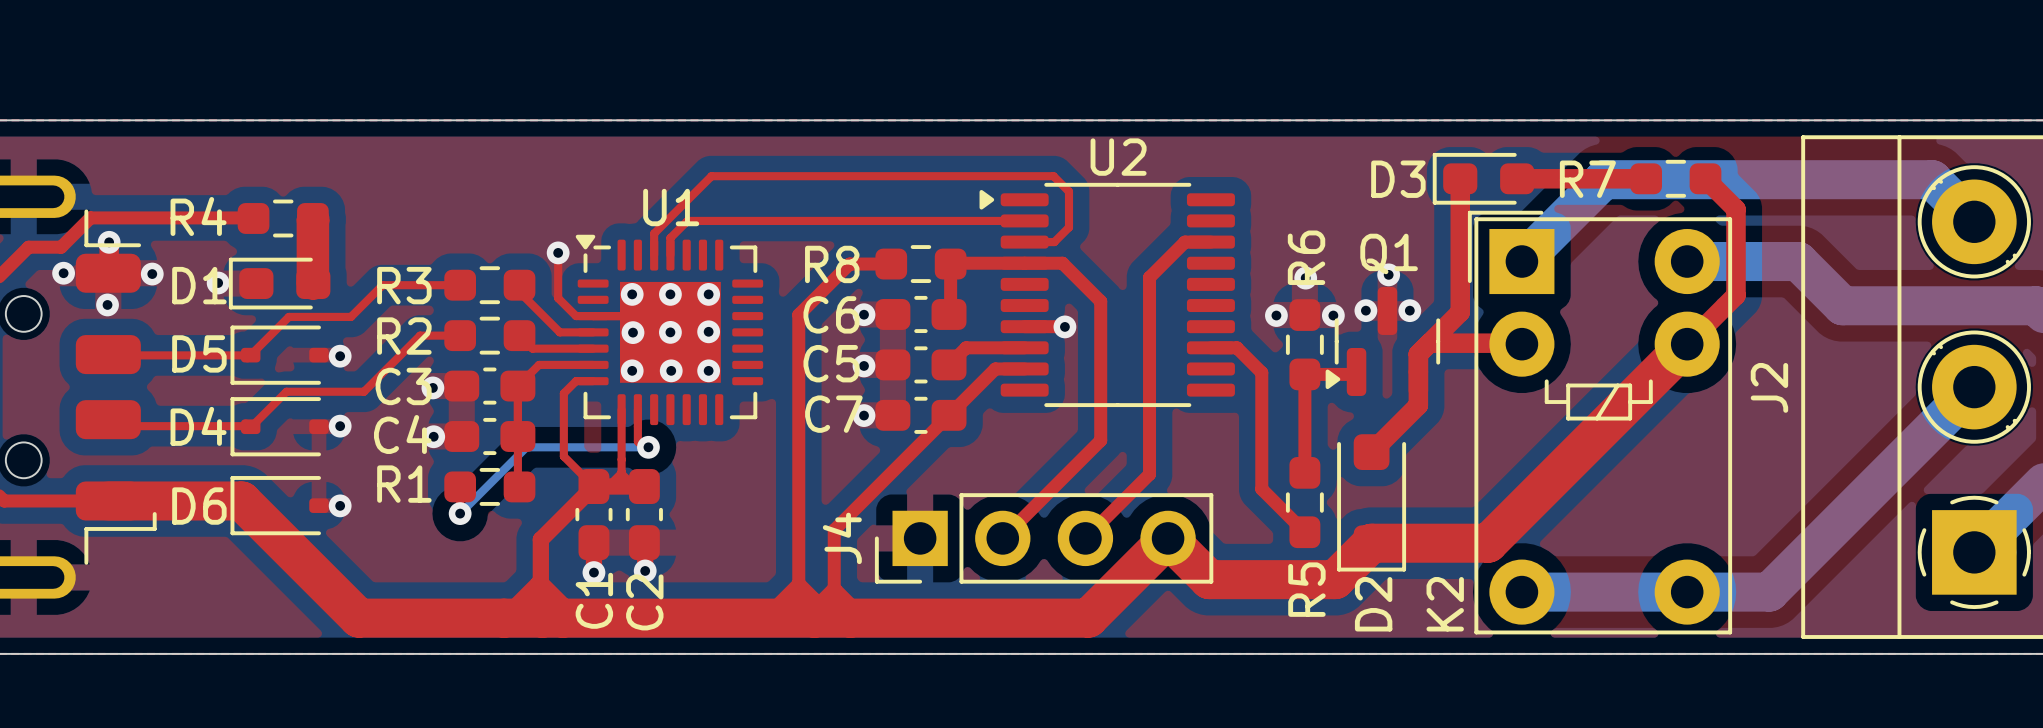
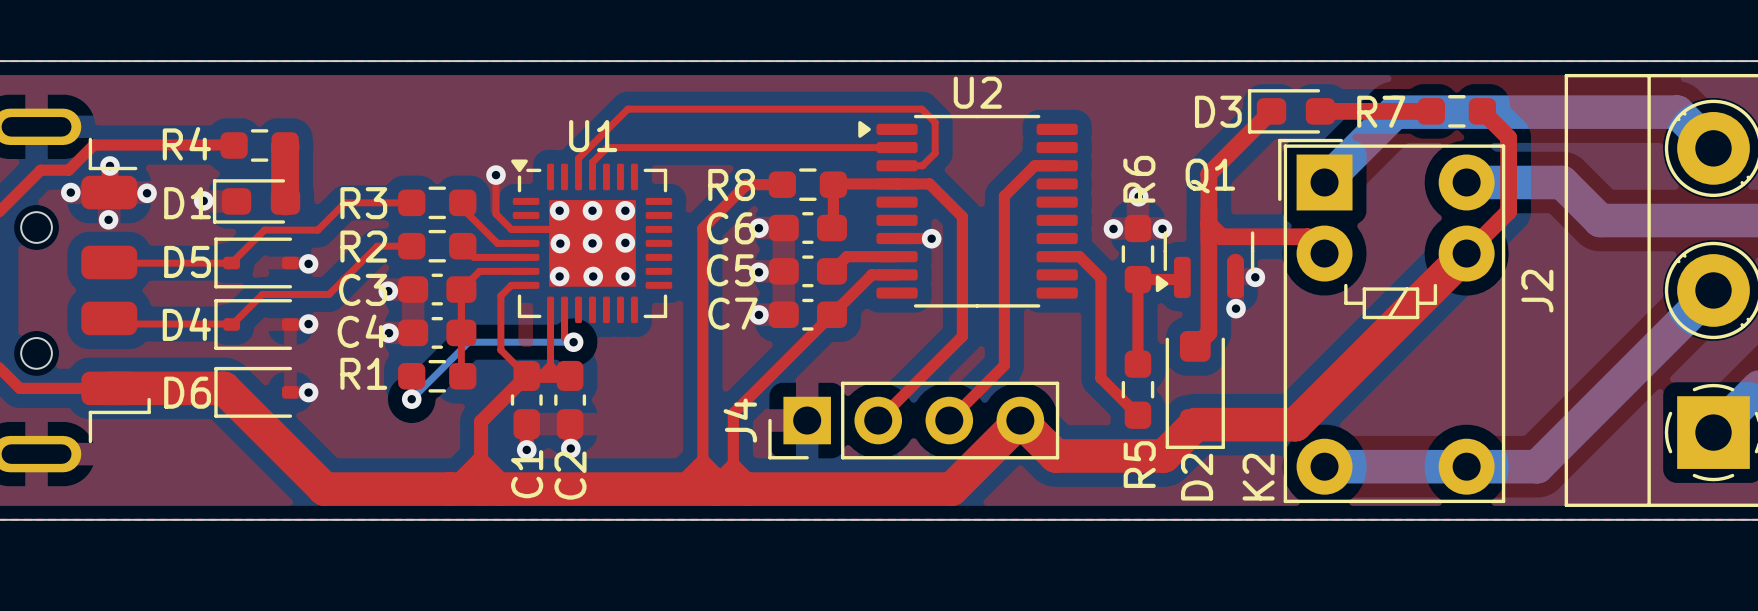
top track: (1460, 178) (1460, 312) (1418, 354) -> (1271, 111) (1208, 174) (1208, 332)
via: (1388, 274) -> none
via: (1365, 310) -> none
via: (1409, 310) -> none
top track: (1429, 343) (1520, 343) -> (1208, 224) (1221, 236) (1307, 236) (1323, 252)
top track: (1418, 371) (1418, 405) (1387, 436) -> none
via: none -> (1255, 277)
via: none -> (1236, 308)

